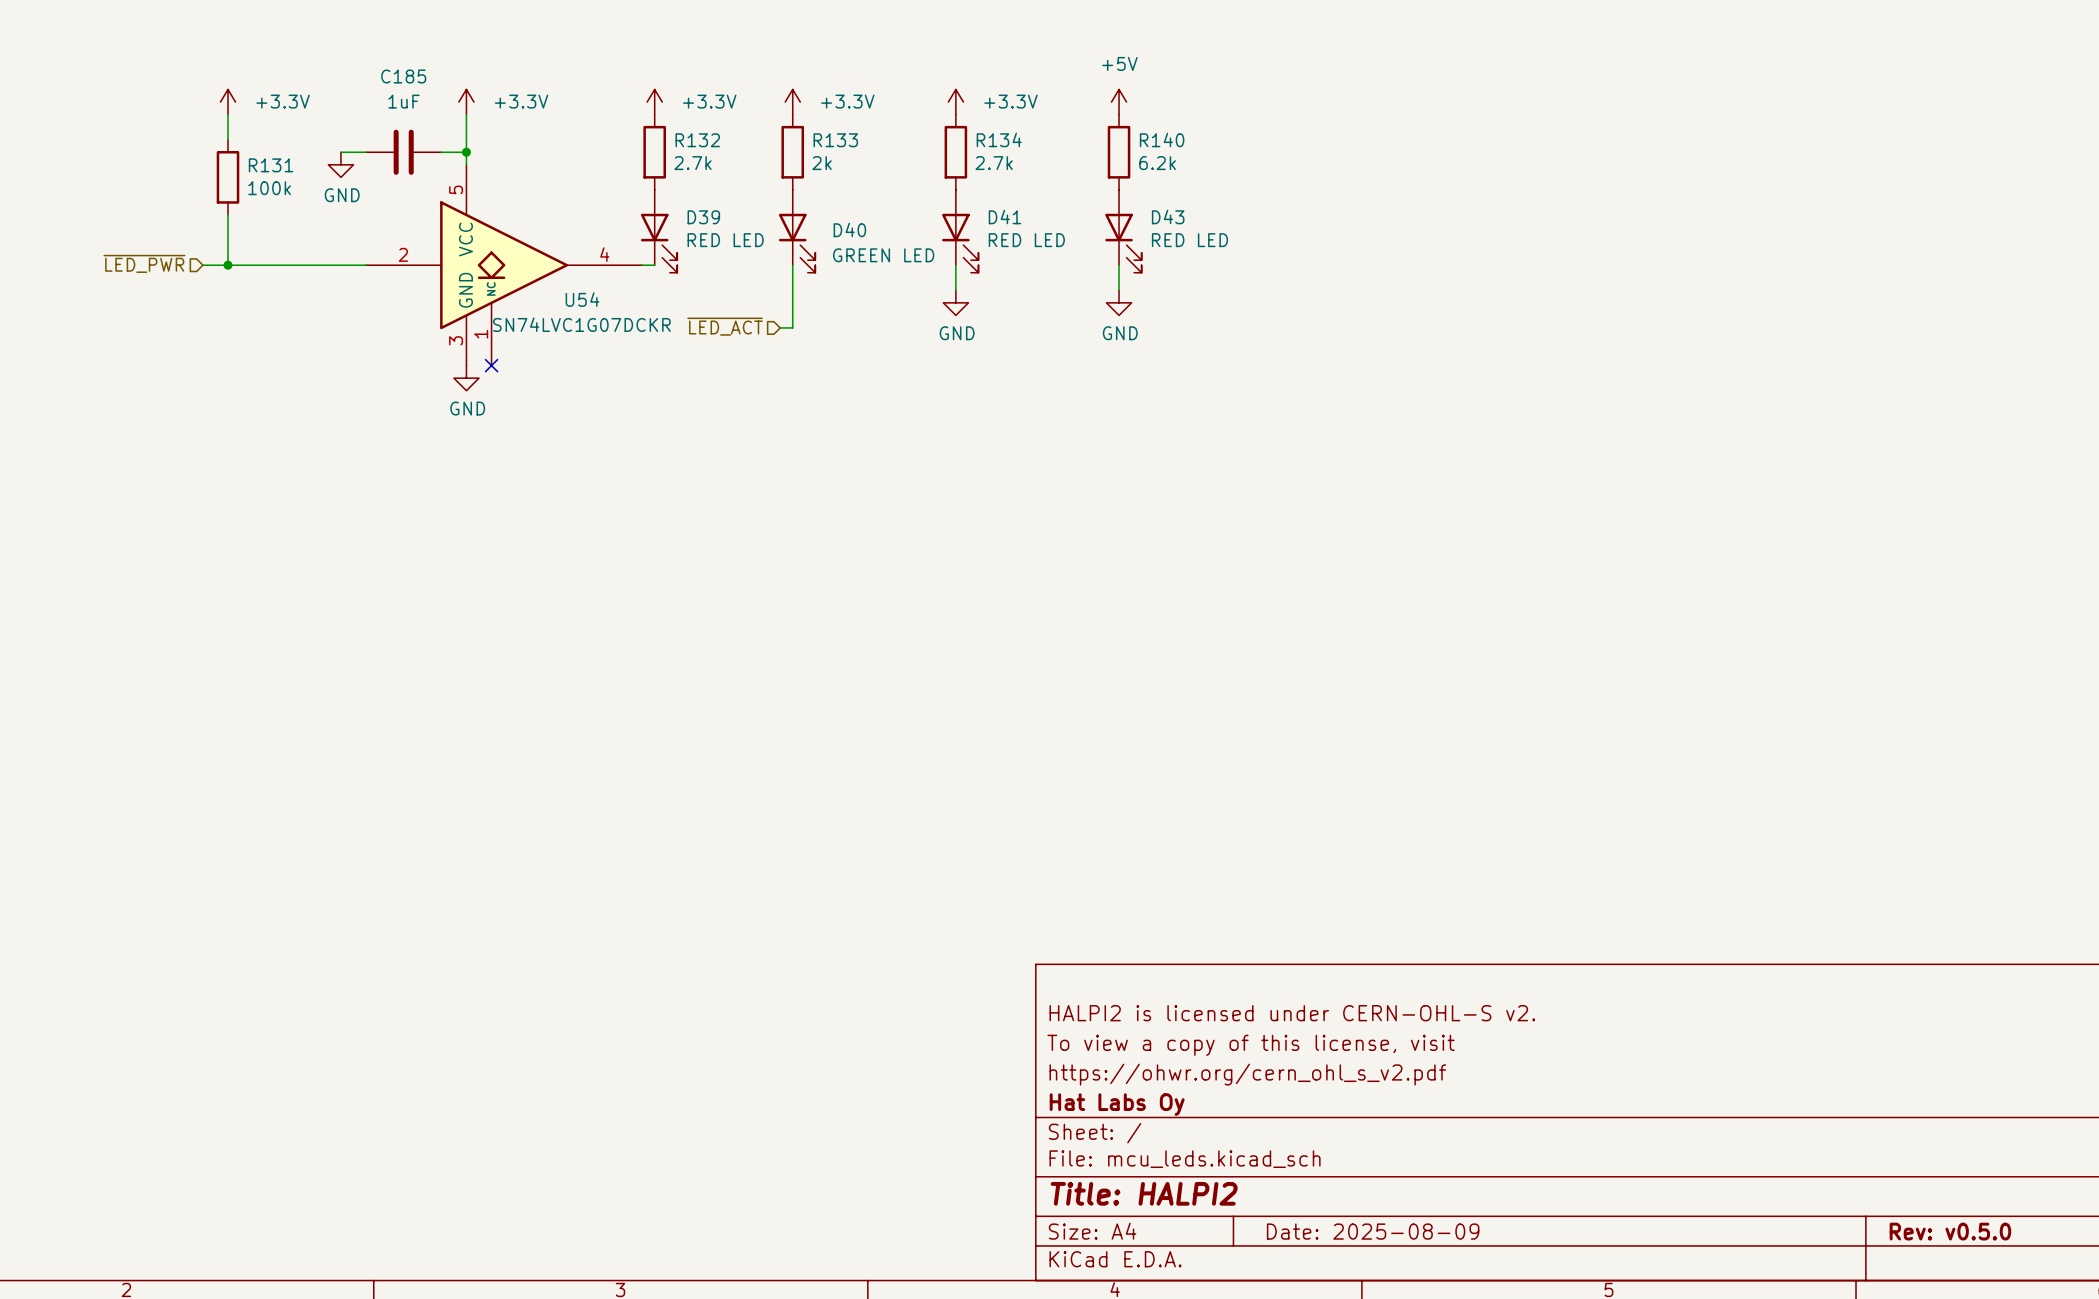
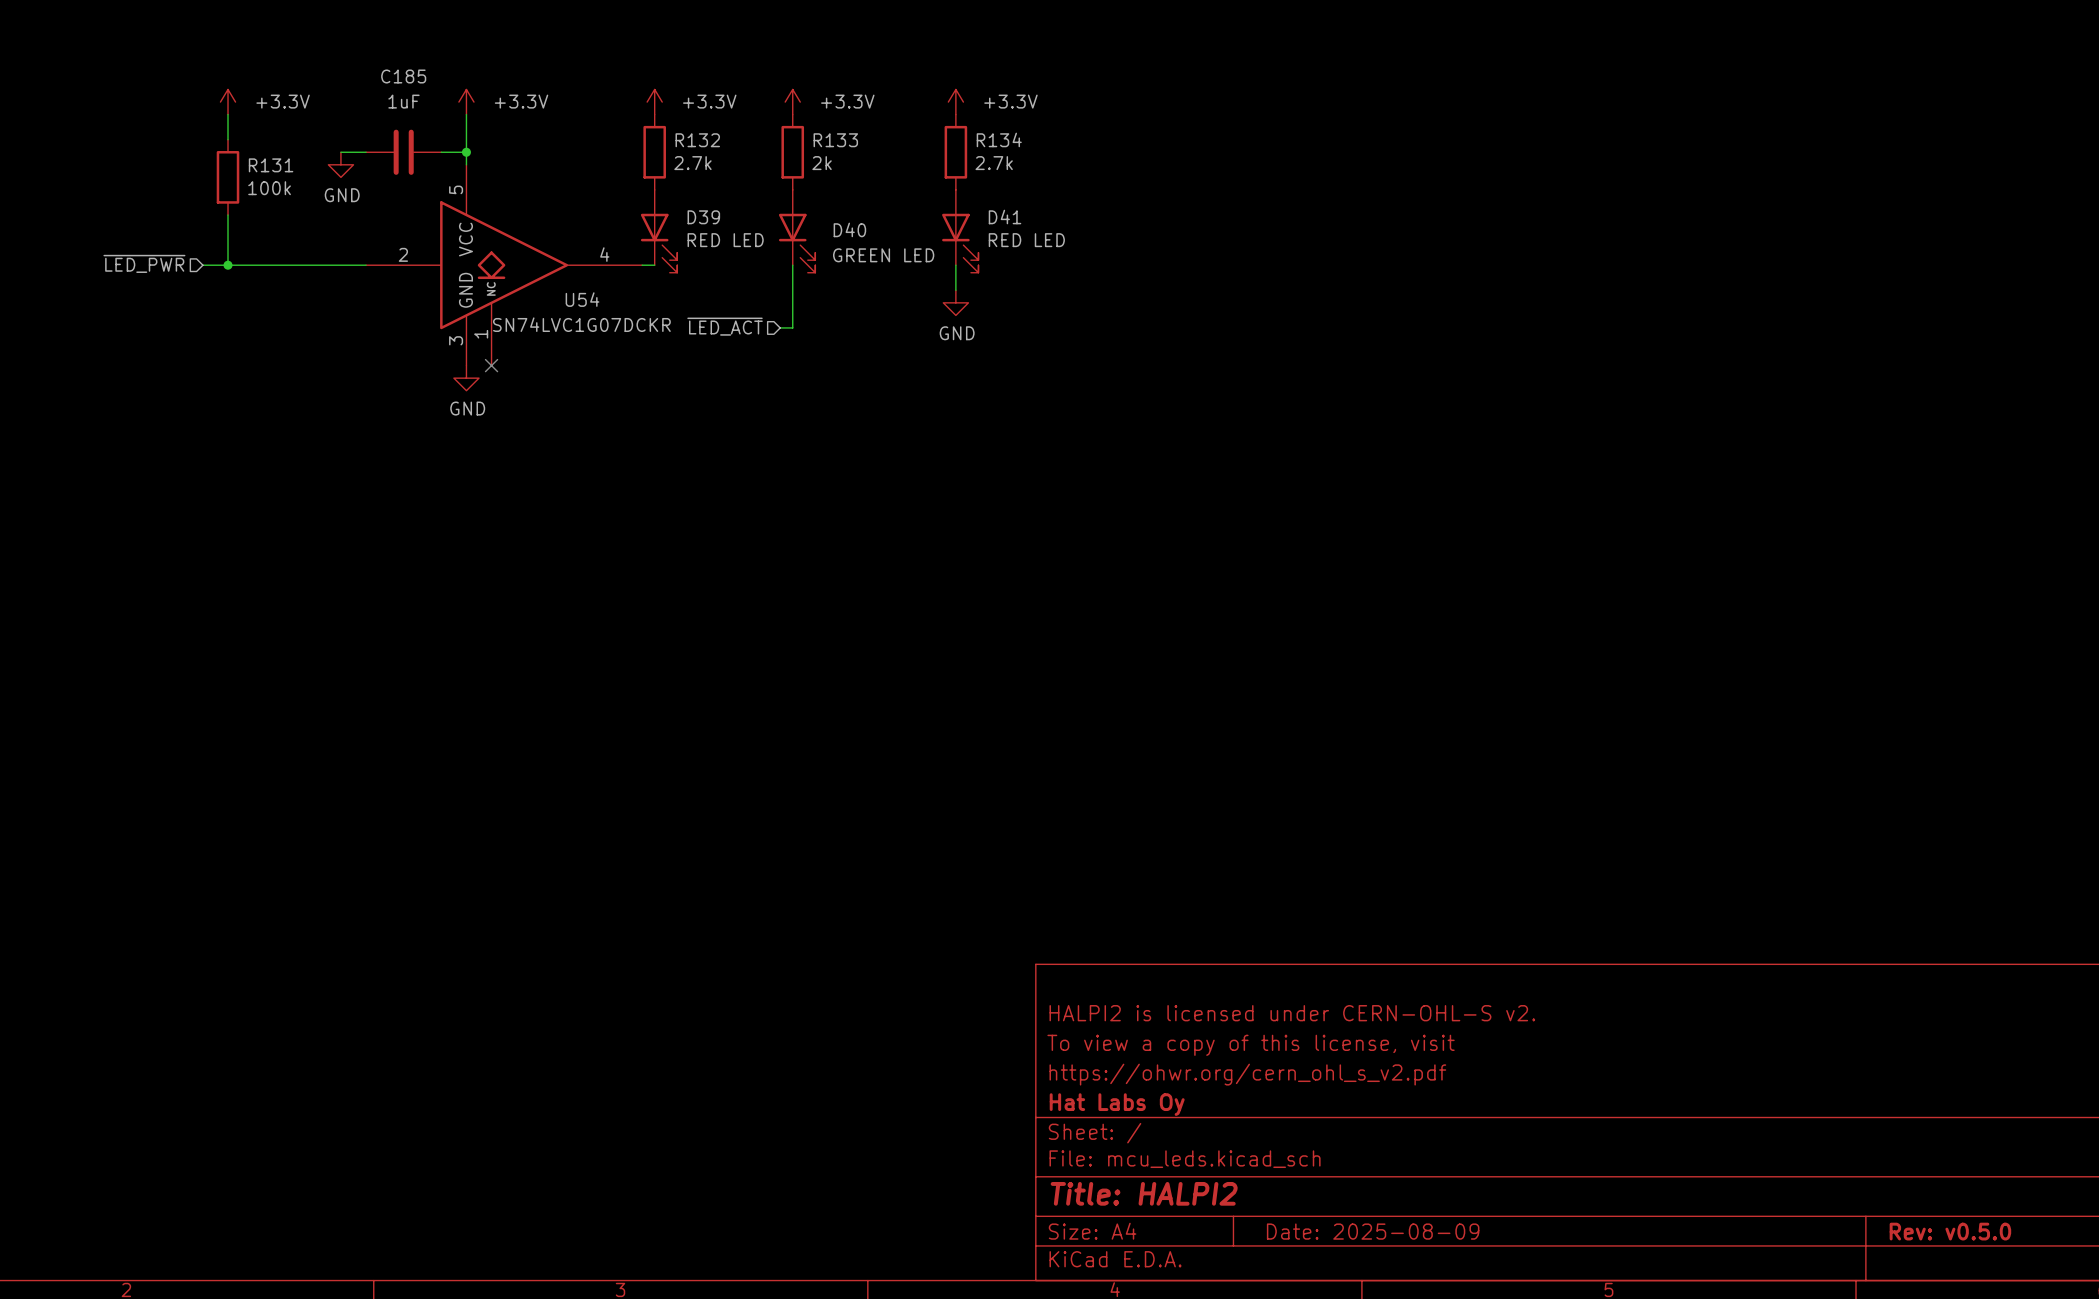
power symbol: +5V (1119, 102) -> none
R140: 6.2k (1119, 152) -> none
D43: RED LED (1123, 231) -> none
wire: (1119, 265) (1119, 290) -> none
power symbol: GND (1119, 302) -> none

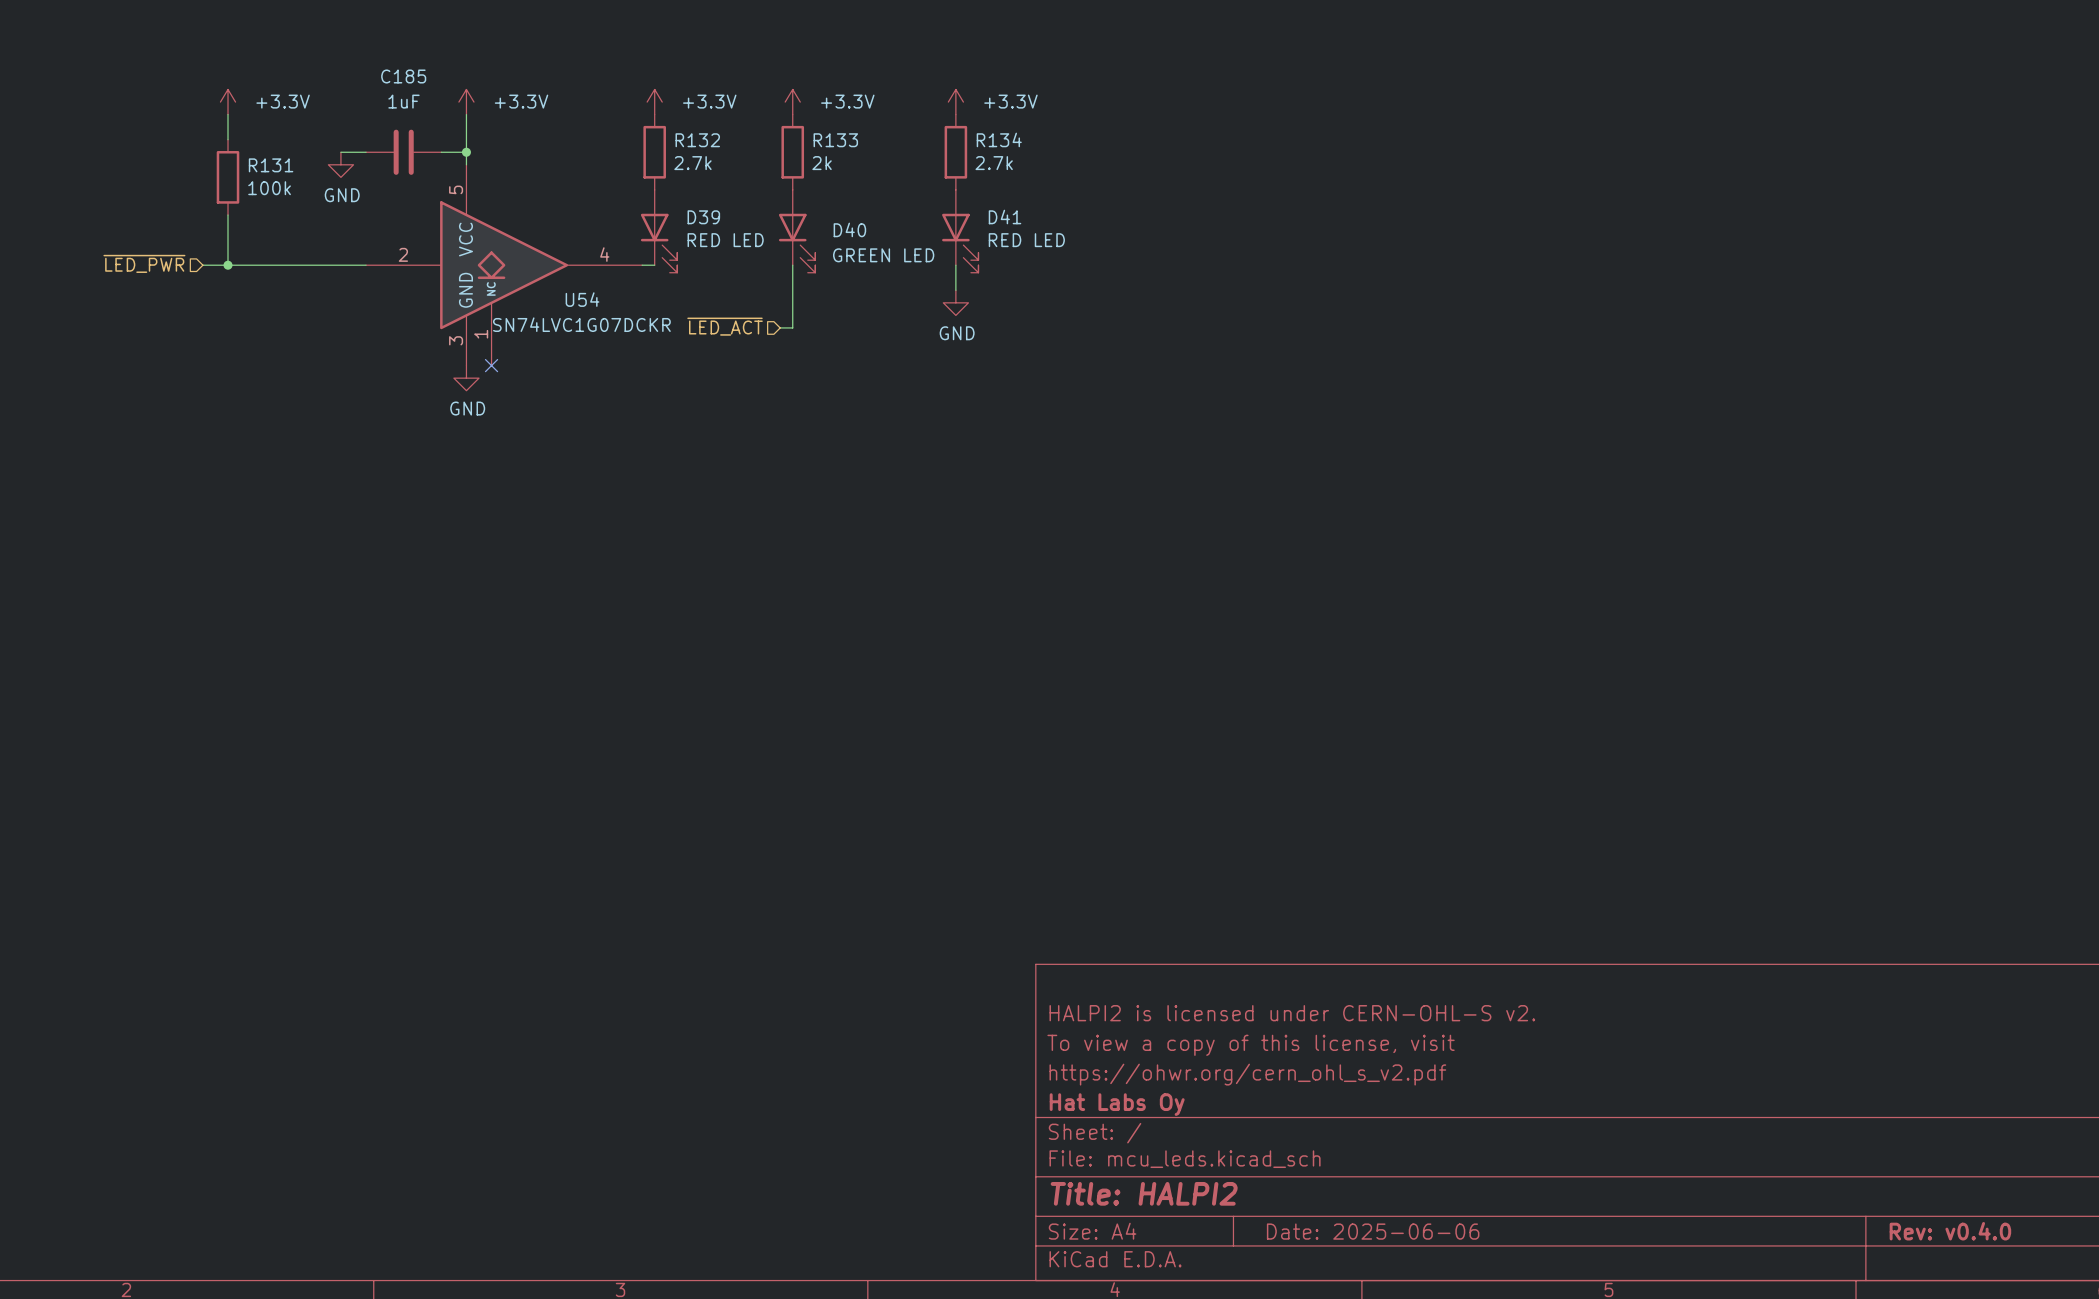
title block: Date: 2025-08-09 (1373, 1231) -> Date: 2025-06-06 (1373, 1231)
title block: Rev: v0.5.0 (1950, 1231) -> Rev: v0.4.0 (1950, 1231)

